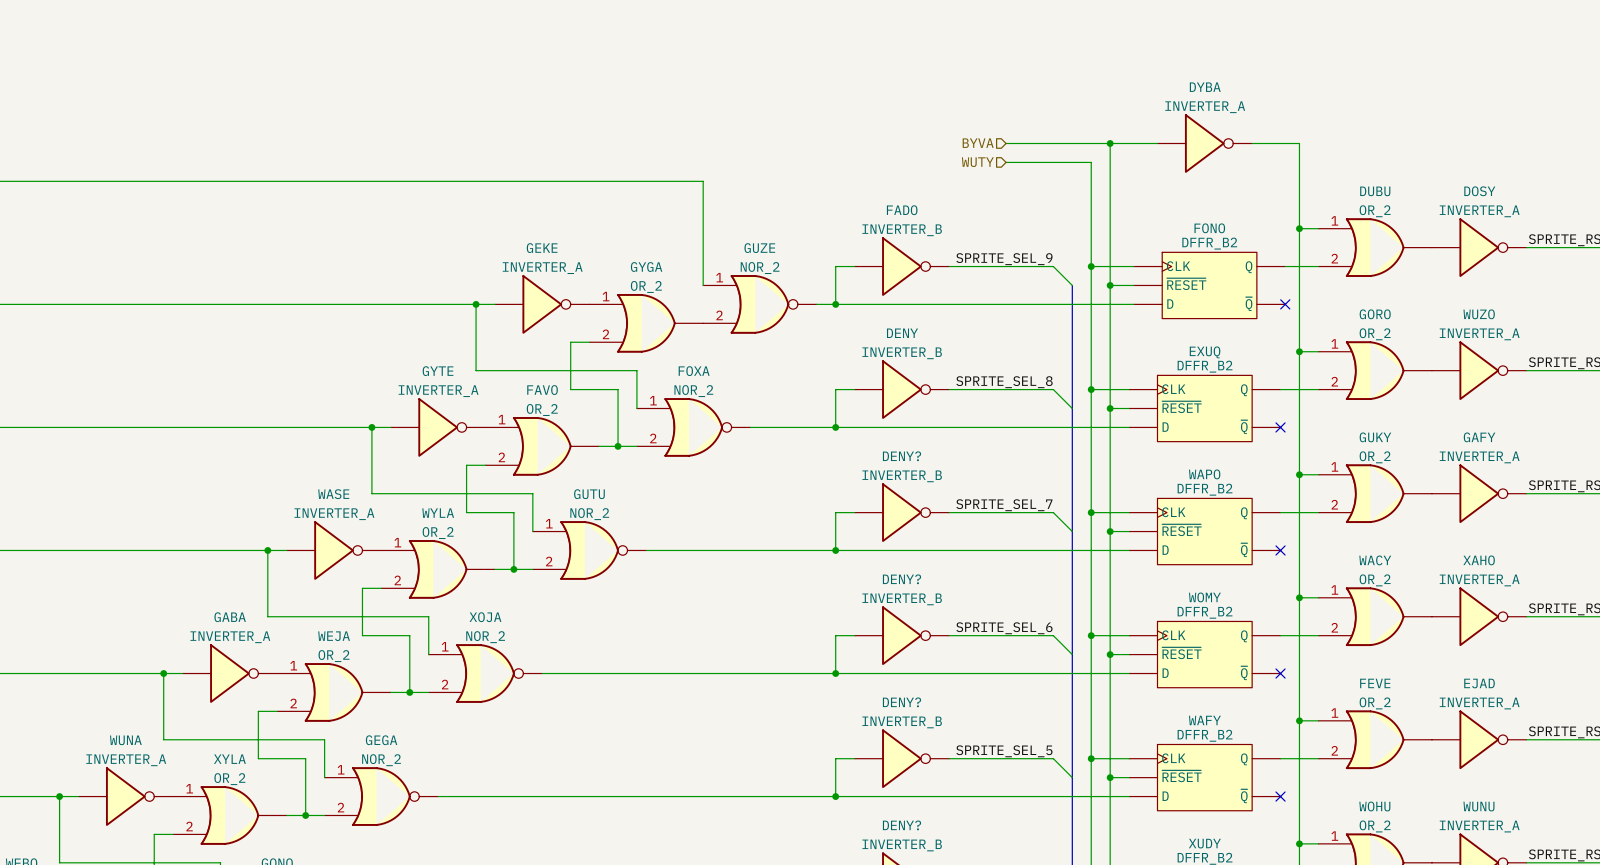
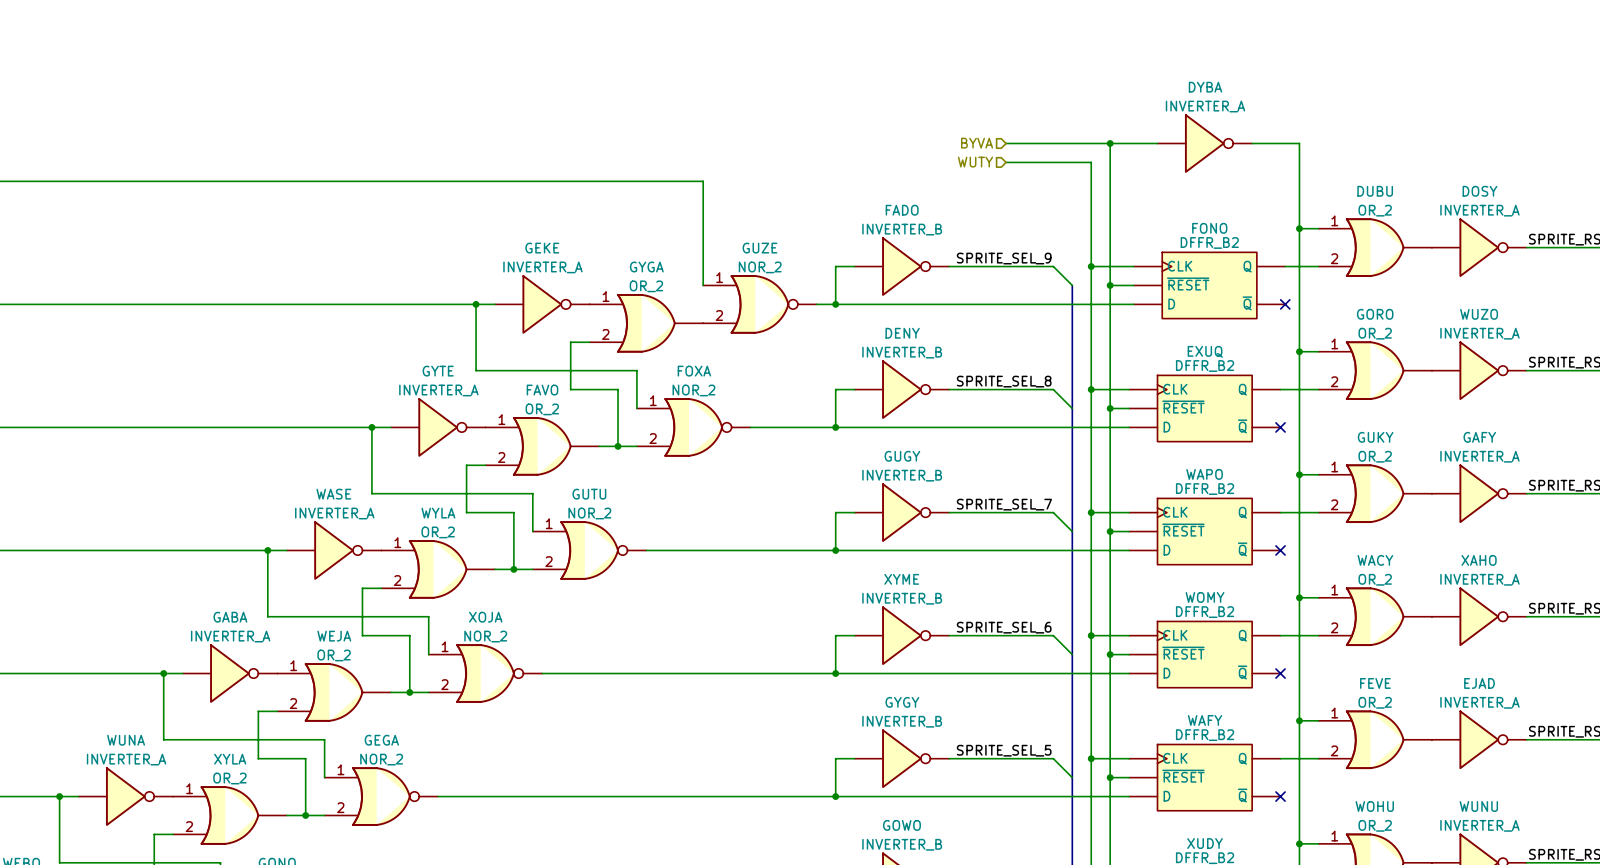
DENY? name: DENY? (901, 456) -> GUGY (902, 456)
DENY? name: DENY? (901, 579) -> XYME (901, 579)
DENY? name: DENY? (901, 702) -> GYGY (902, 702)
DENY? name: DENY? (901, 825) -> GOWO (901, 825)

